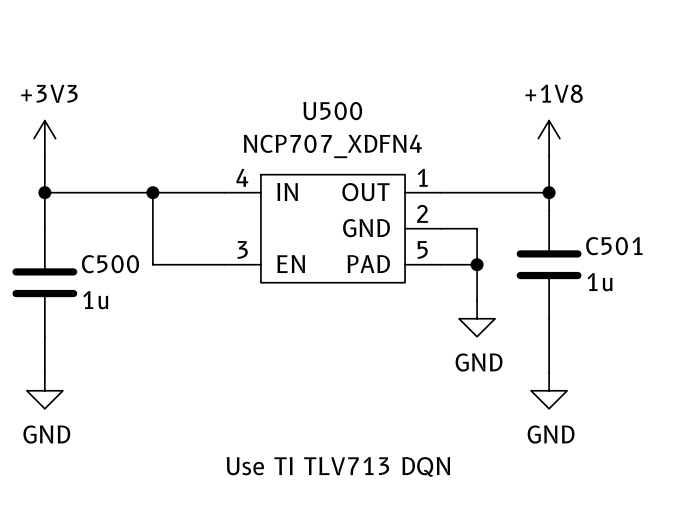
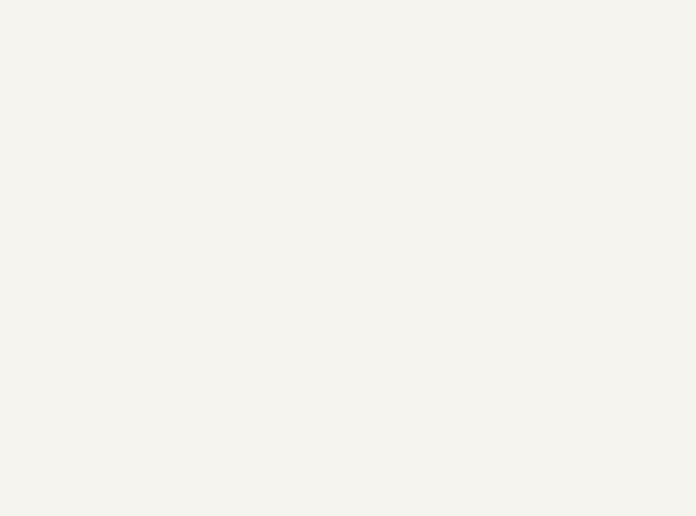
power symbol: +3V3 (44, 138) -> none
power symbol: +1V8 (549, 138) -> none
wire: (44, 156) (44, 228) -> none
wire: (549, 156) (549, 210) -> none
wire: (44, 192) (224, 192) -> none
junction: (44, 192) -> none
wire: (152, 192) (152, 264) (224, 264) -> none
junction: (152, 192) -> none
wire: (441, 192) (549, 192) -> none
junction: (549, 192) -> none
U500: NCP707_XDFN4 (332, 228) -> none
wire: (441, 228) (477, 228) (477, 300) -> none
wire: (441, 264) (477, 264) -> none
junction: (477, 264) -> none
C501: 1u (549, 264) -> none
C500: 1u (44, 282) -> none
power symbol: GND (477, 318) -> none
wire: (549, 318) (549, 372) -> none
wire: (44, 336) (44, 372) -> none
power symbol: GND (44, 390) -> none
power symbol: GND (549, 390) -> none
text: Use TI TLV713 DQN (338, 466) -> none

